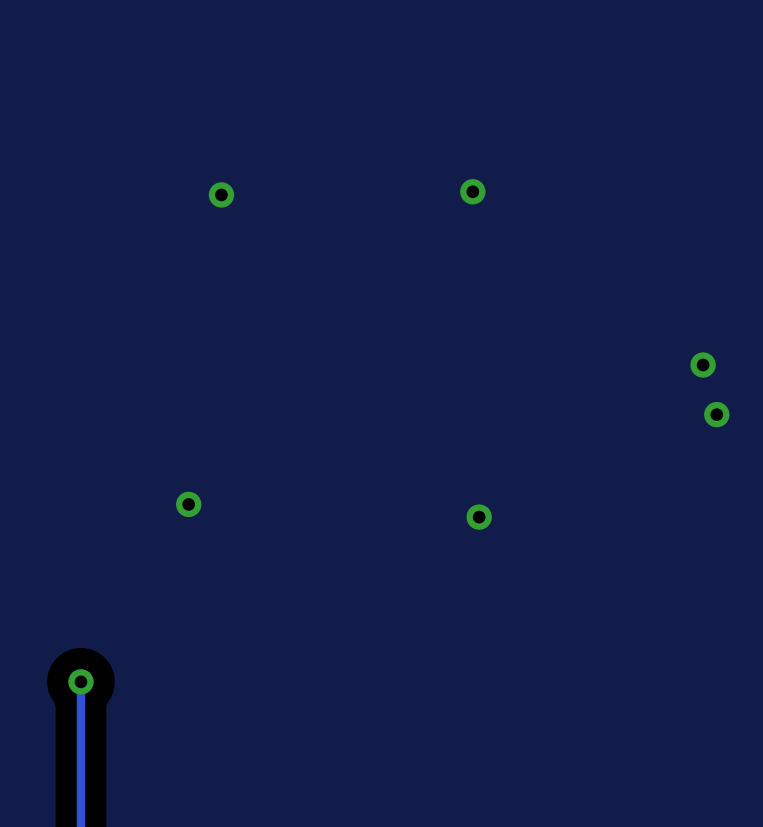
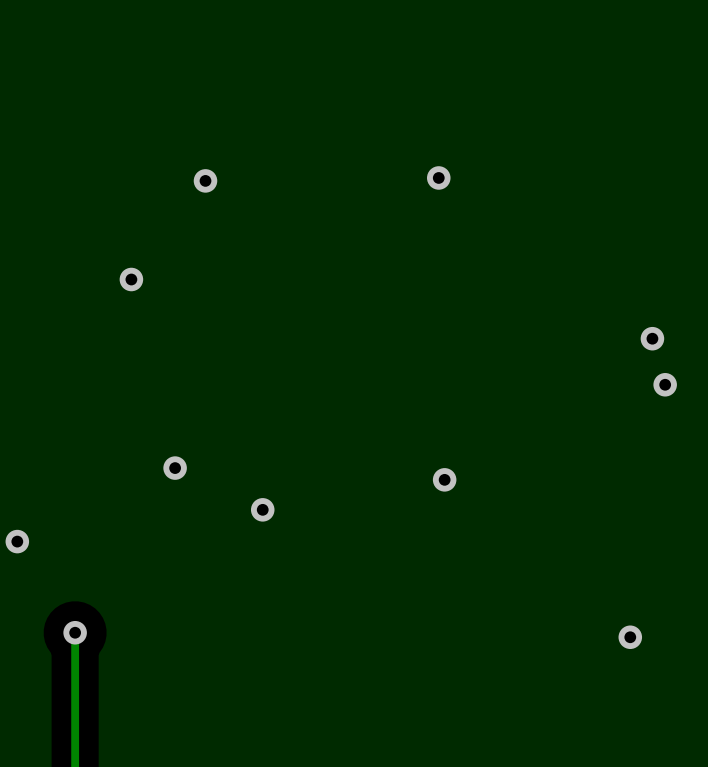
via: none -> (131, 279)
via: none -> (262, 509)
via: none -> (17, 541)
via: none -> (630, 637)

